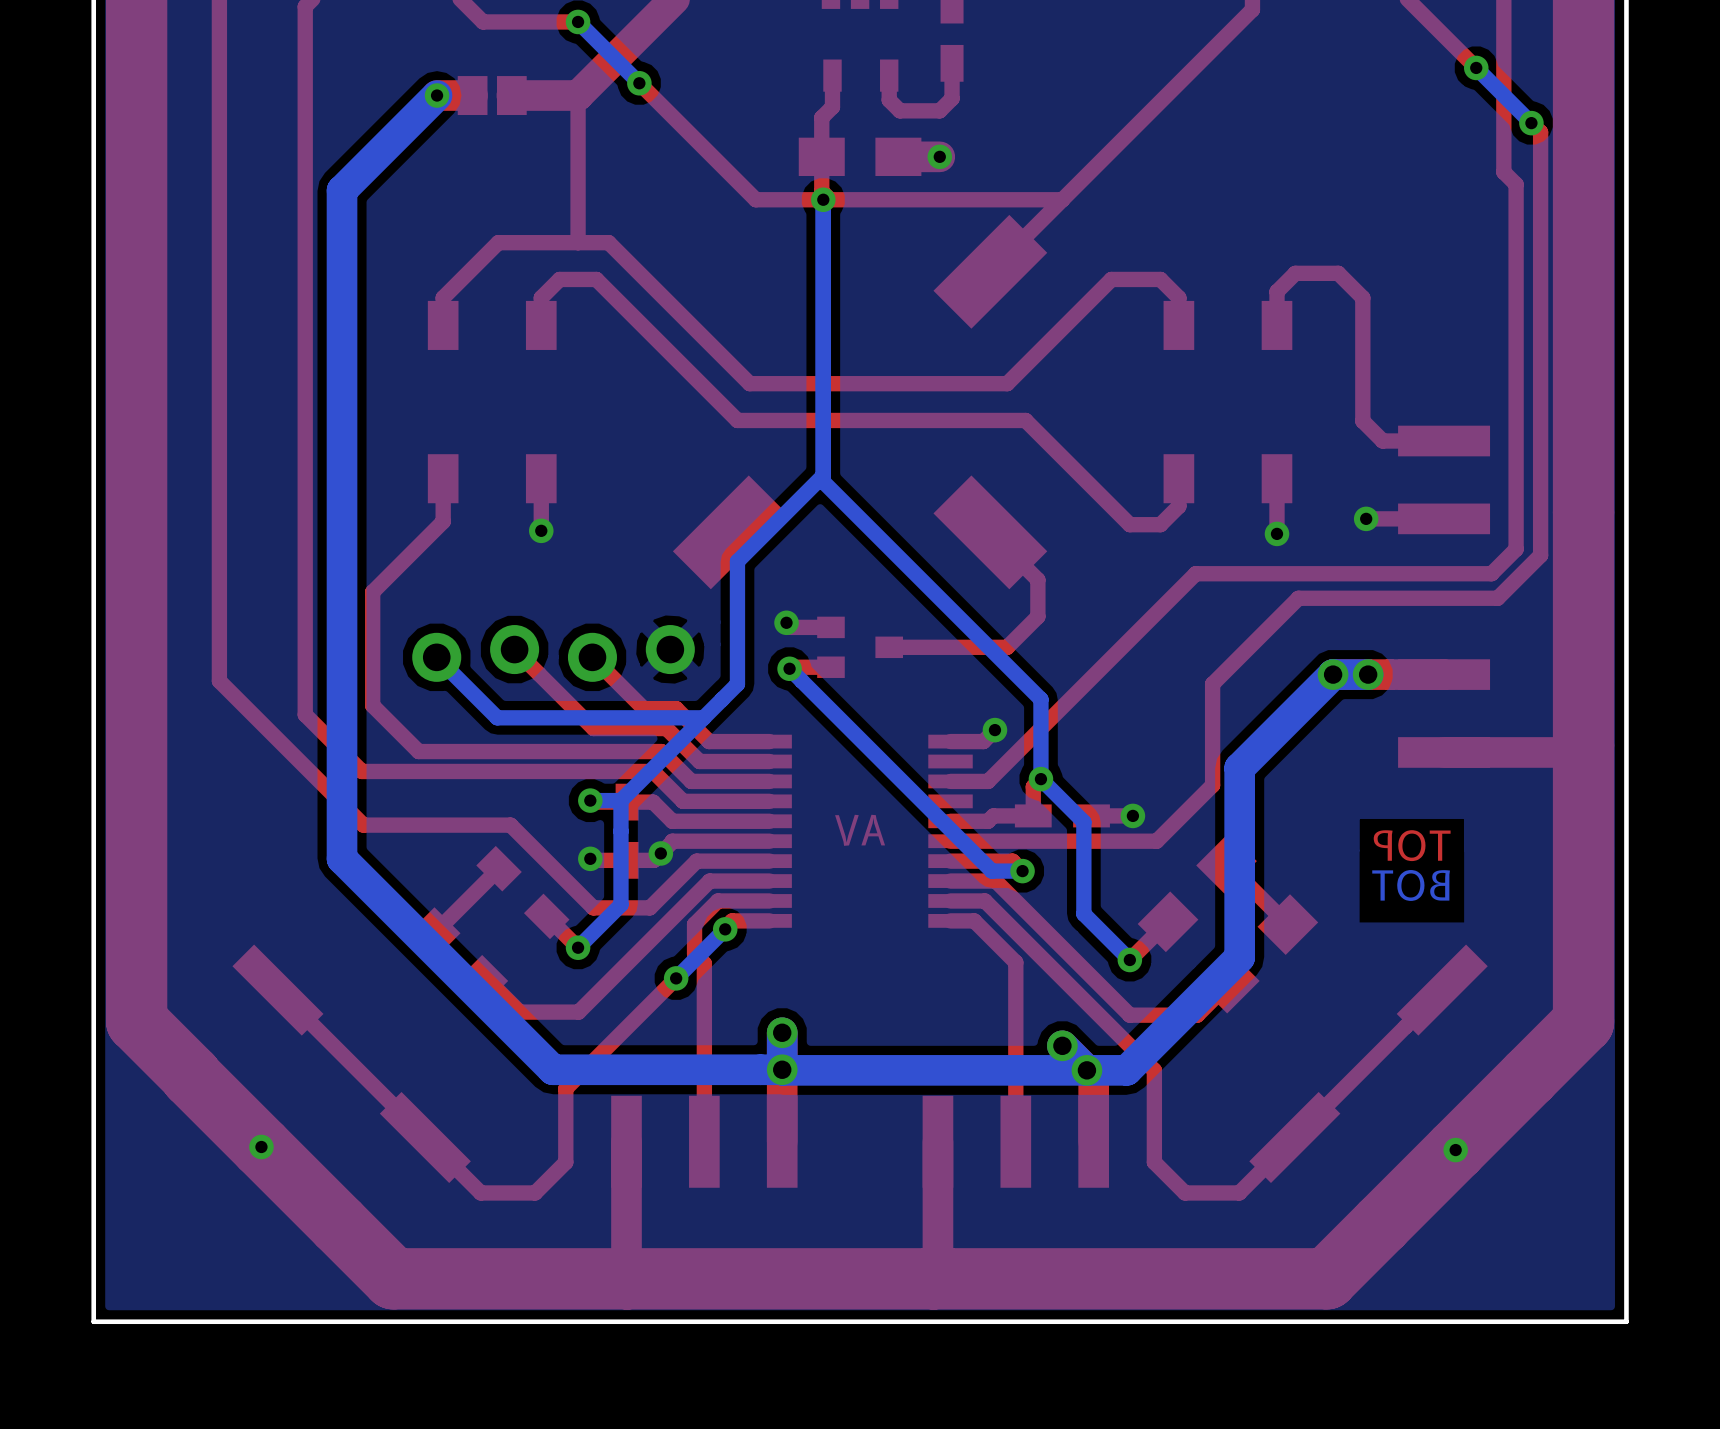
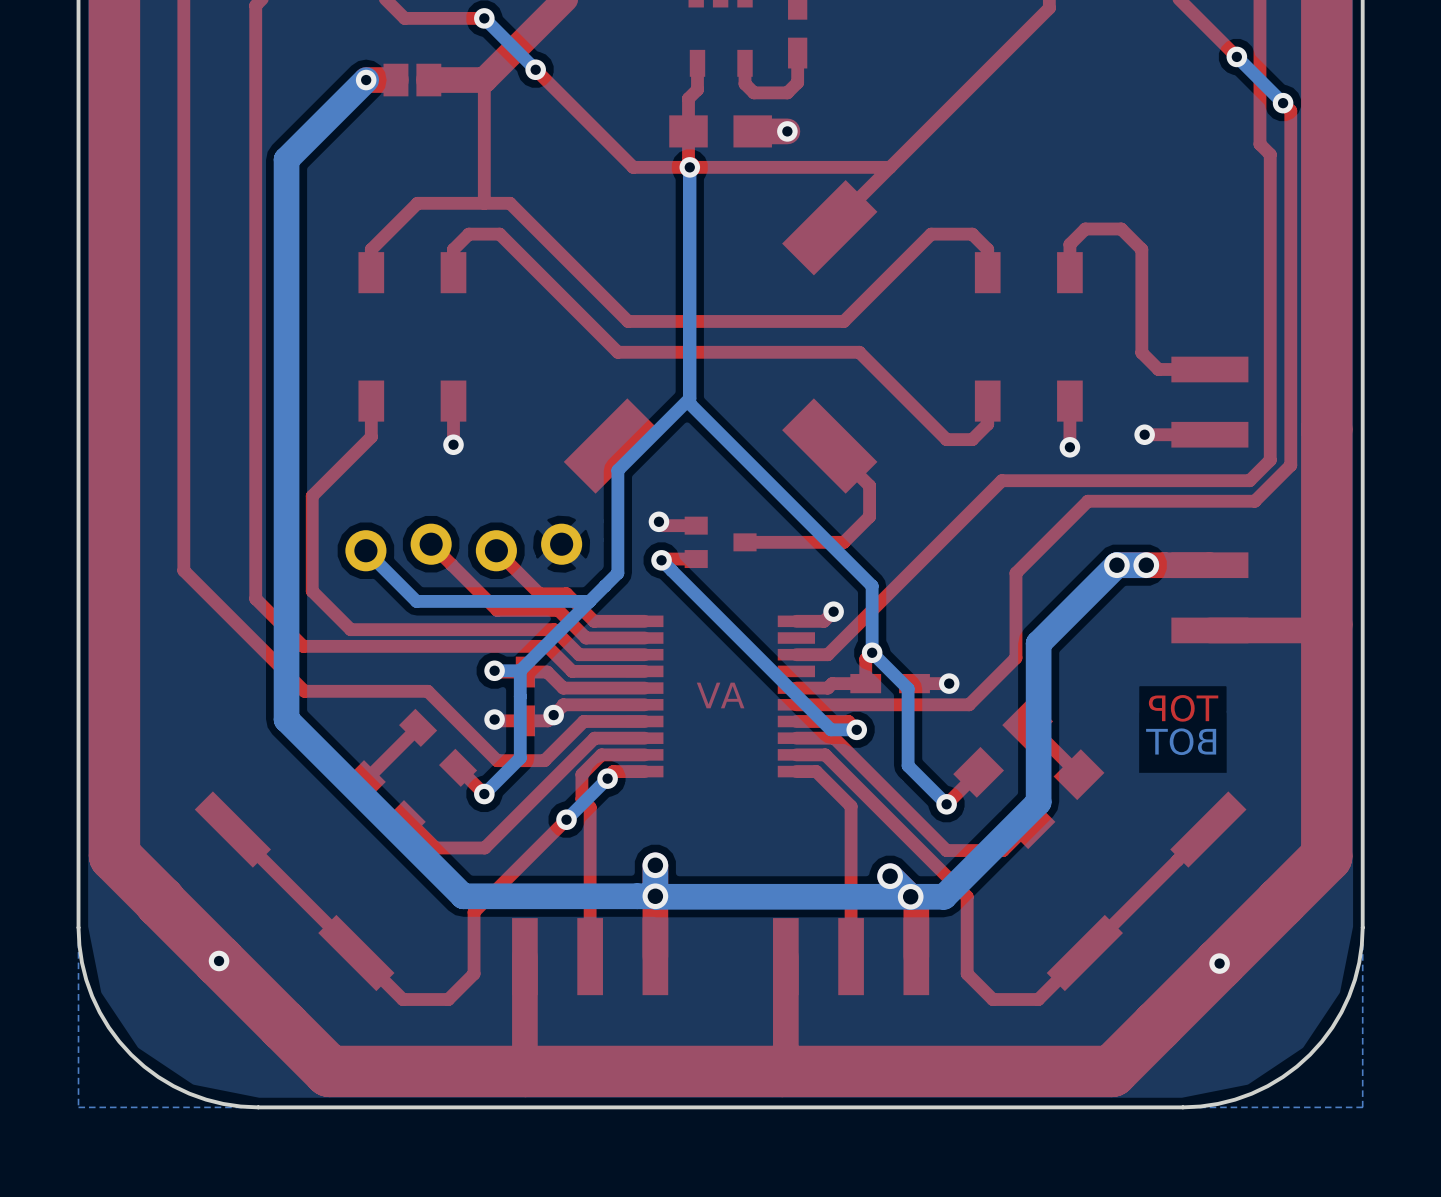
board edge: (93, 1107) (93, 1321) (308, 1321) -> (78, 927) (81, 962) (92, 996) (108, 1027) (131, 1054) (158, 1077) (189, 1093) (223, 1103) (258, 1107)
board edge: (1626, 1107) (1626, 1321) (1411, 1321) -> (1362, 927) (1359, 962) (1349, 996) (1332, 1027) (1310, 1054) (1282, 1077) (1251, 1093) (1217, 1103) (1182, 1107)

